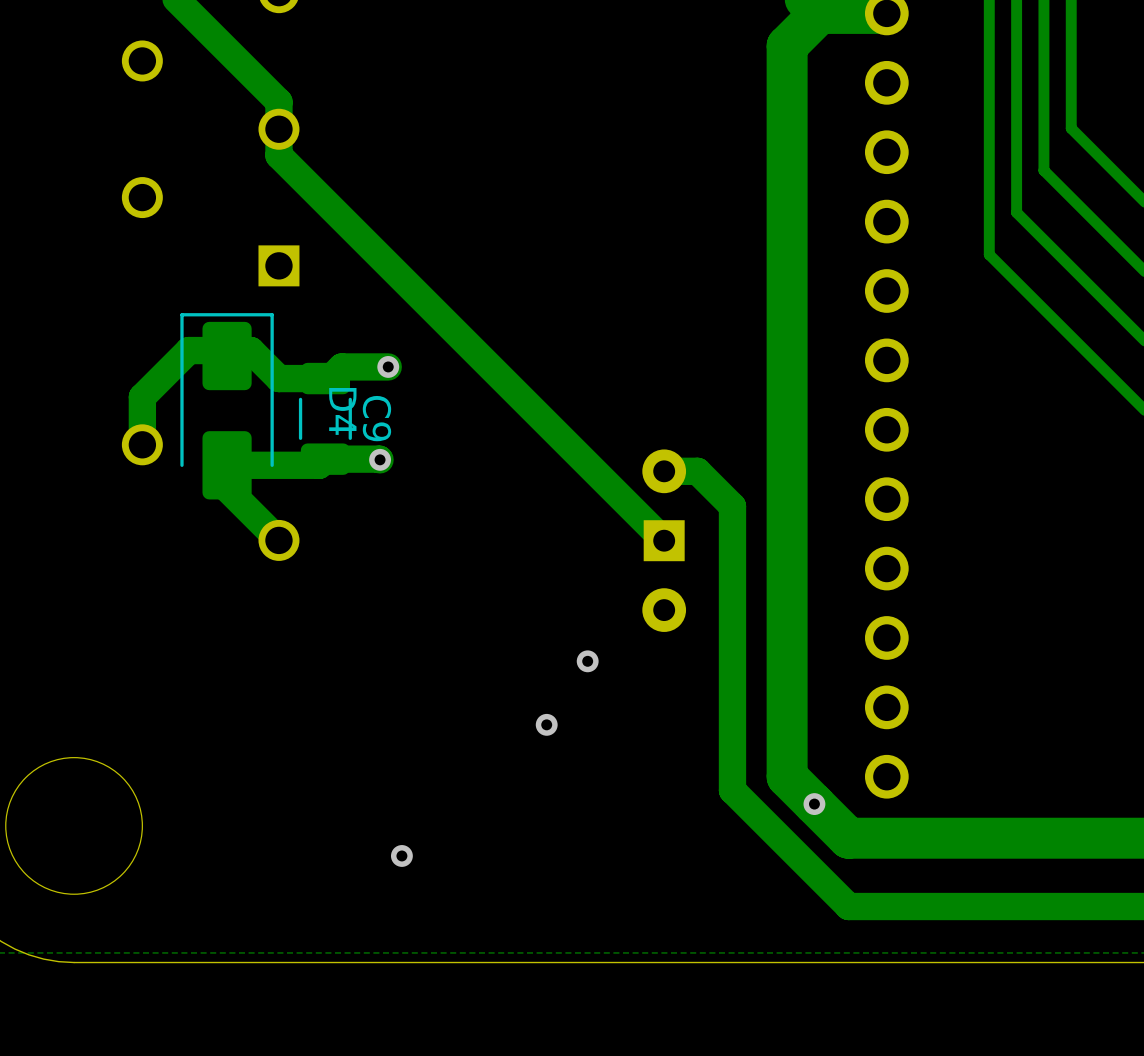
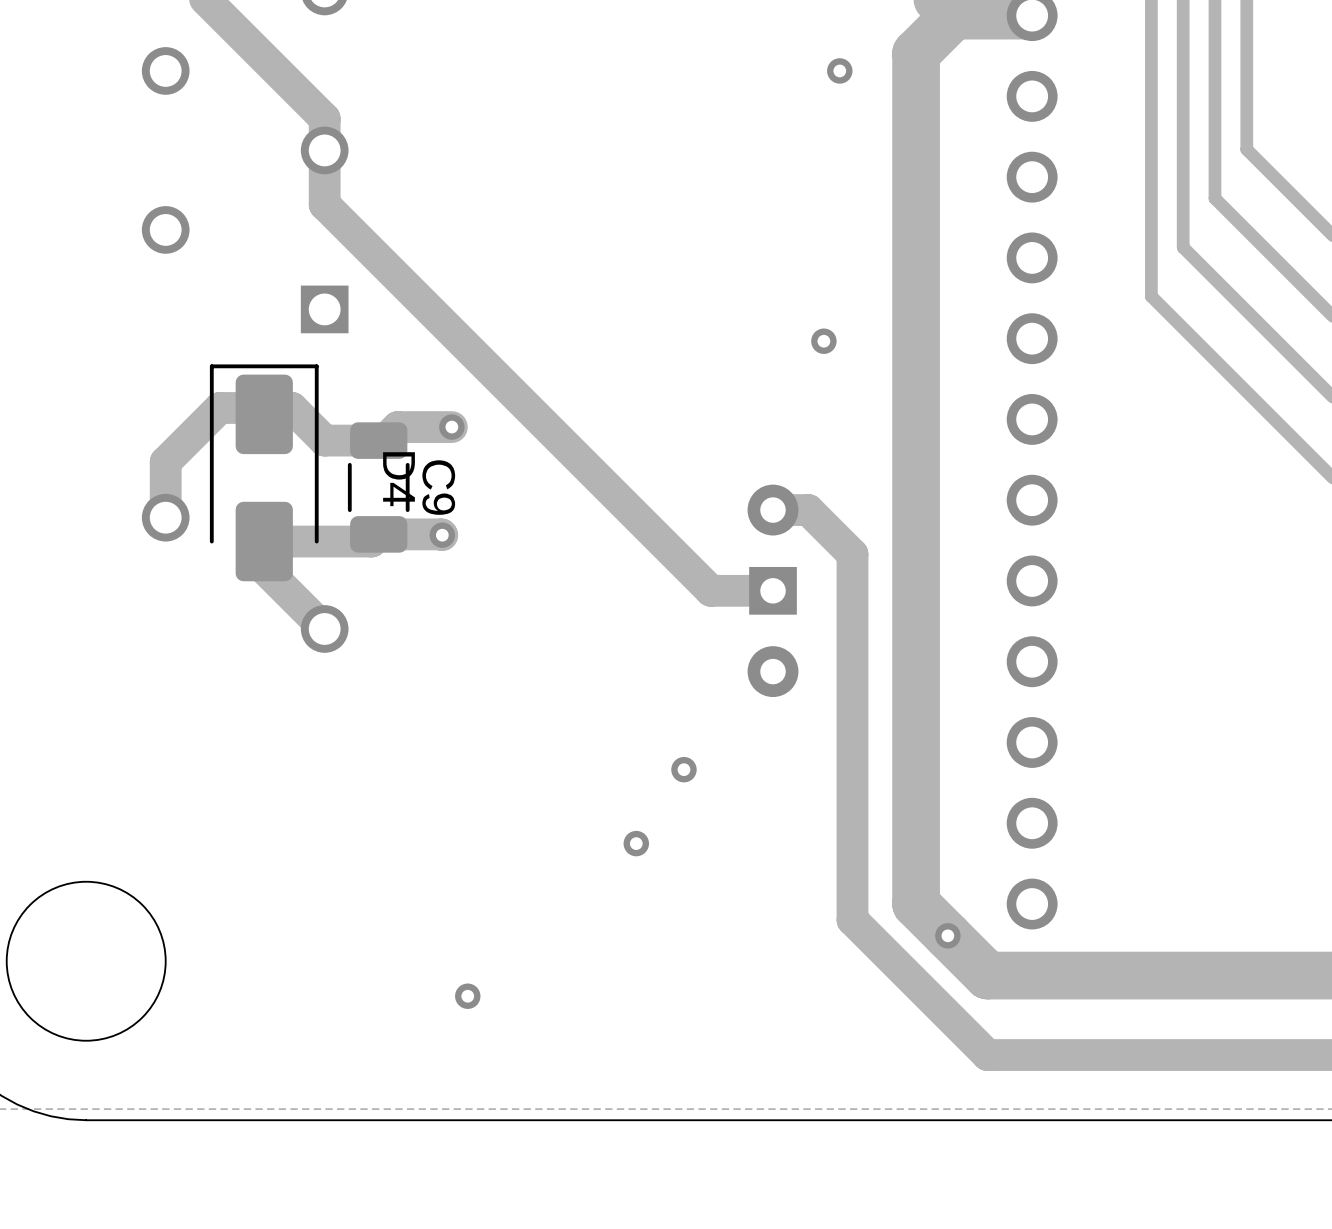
via: none -> (839, 70)
track: (278, 155) (664, 540) -> (324, 180) (324, 204) (711, 590) (758, 590)
via: none -> (823, 341)
track: (664, 471) (697, 471) (732, 506) -> (773, 510) (808, 510) (852, 554) (852, 589)
part position: (664, 540) -> (773, 590)

